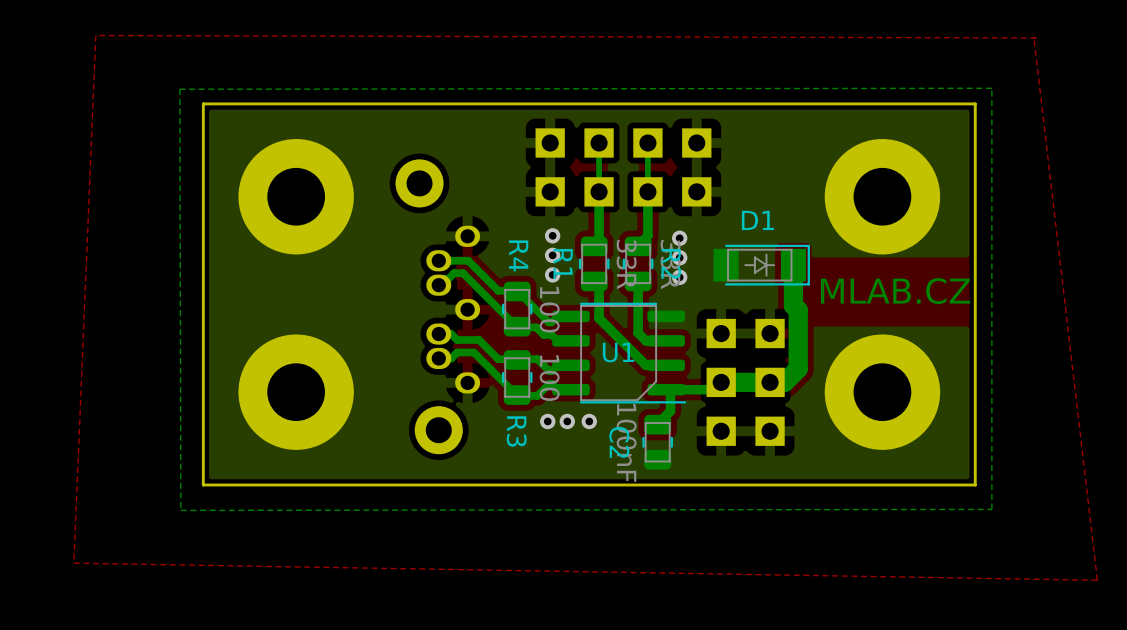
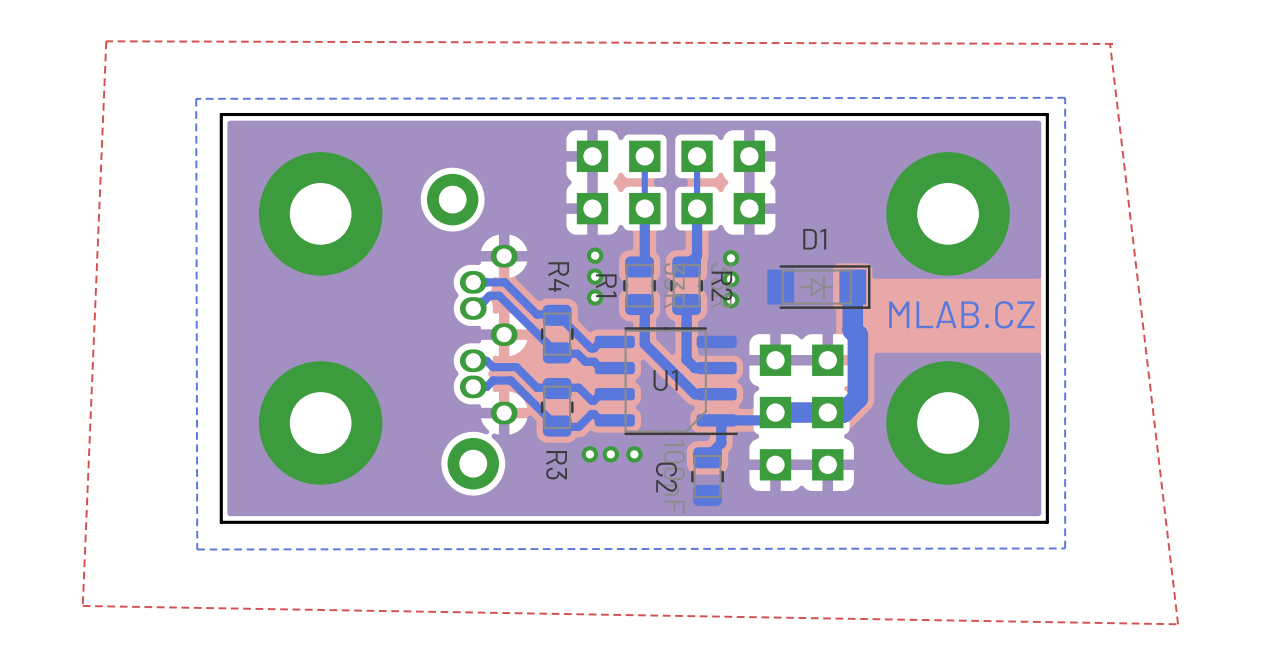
R4 value: 100 (549, 309) -> none
R3 value: 100 (549, 378) -> none

